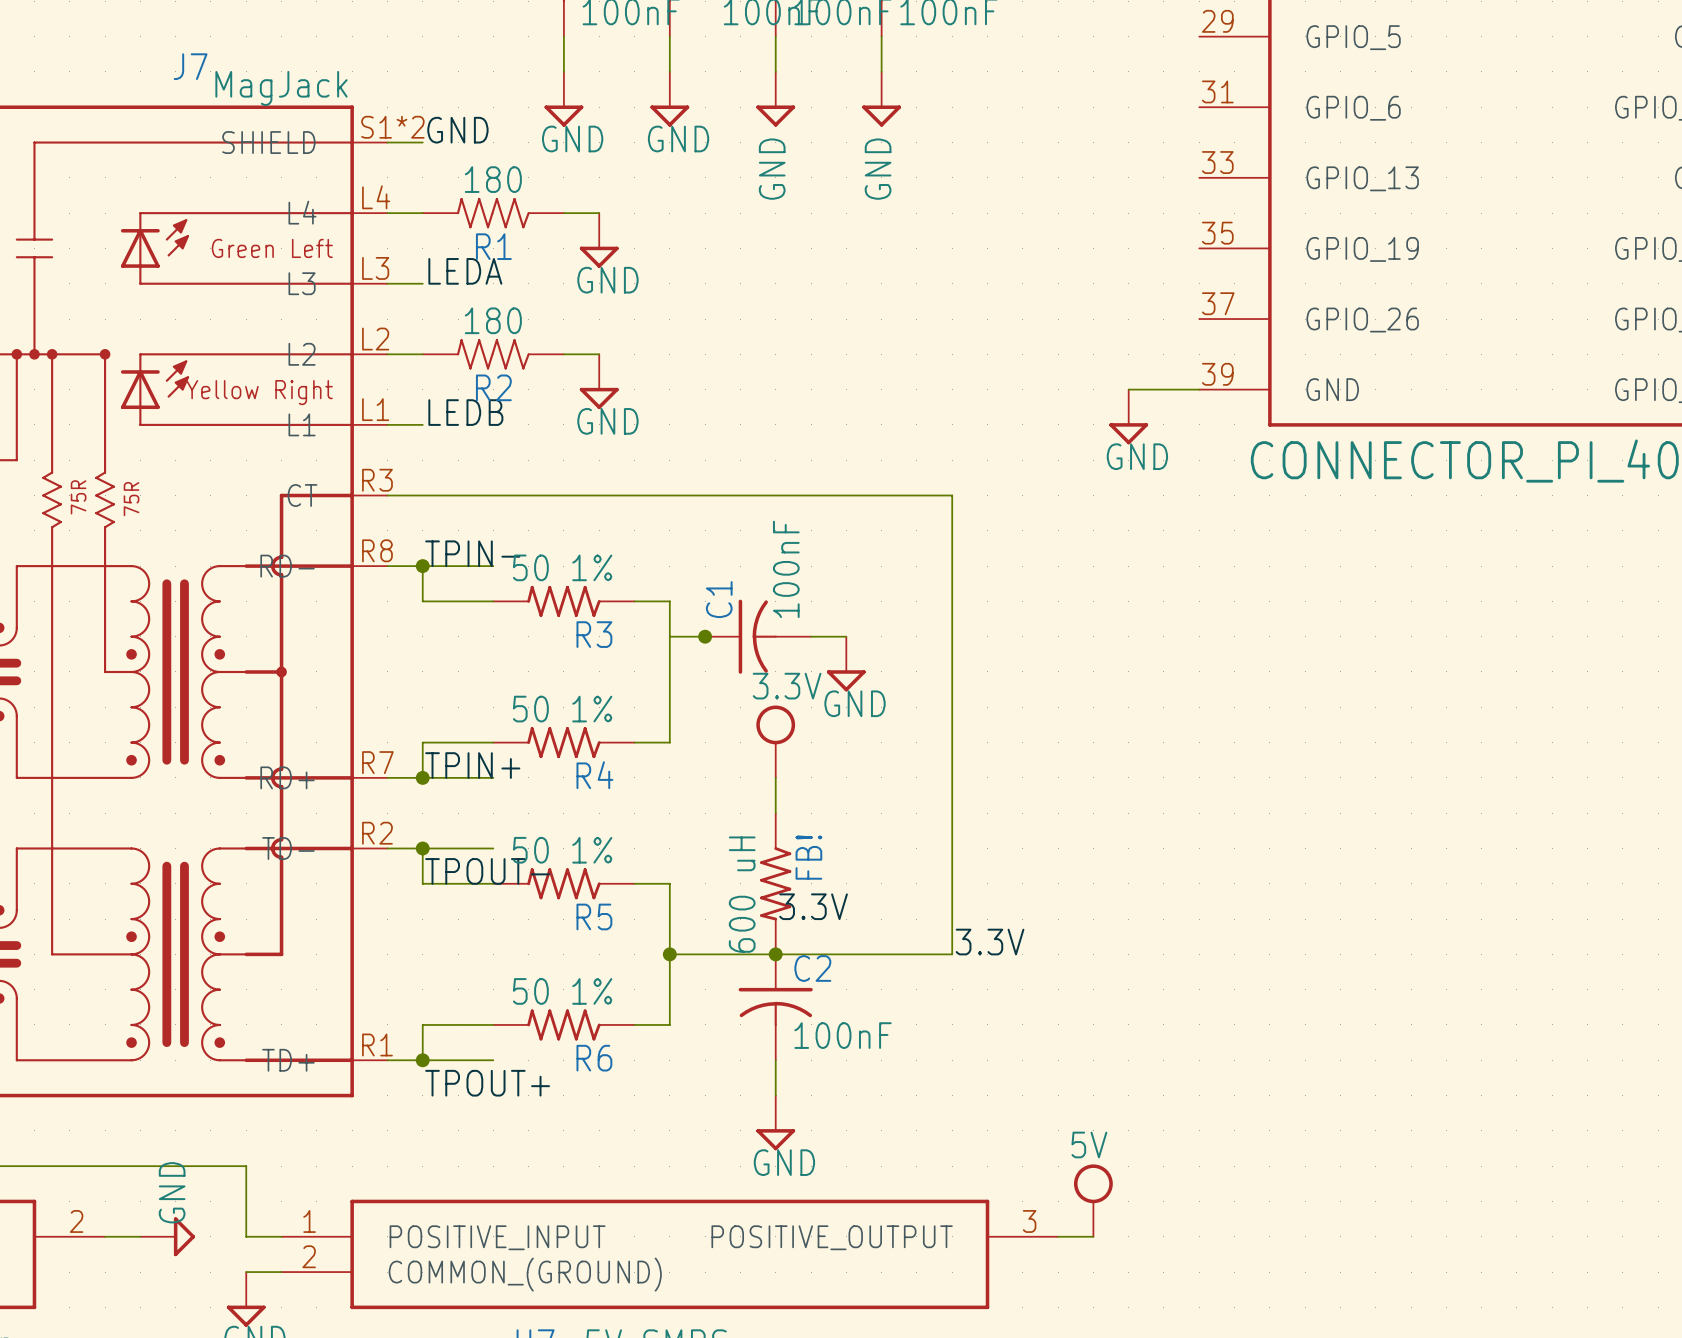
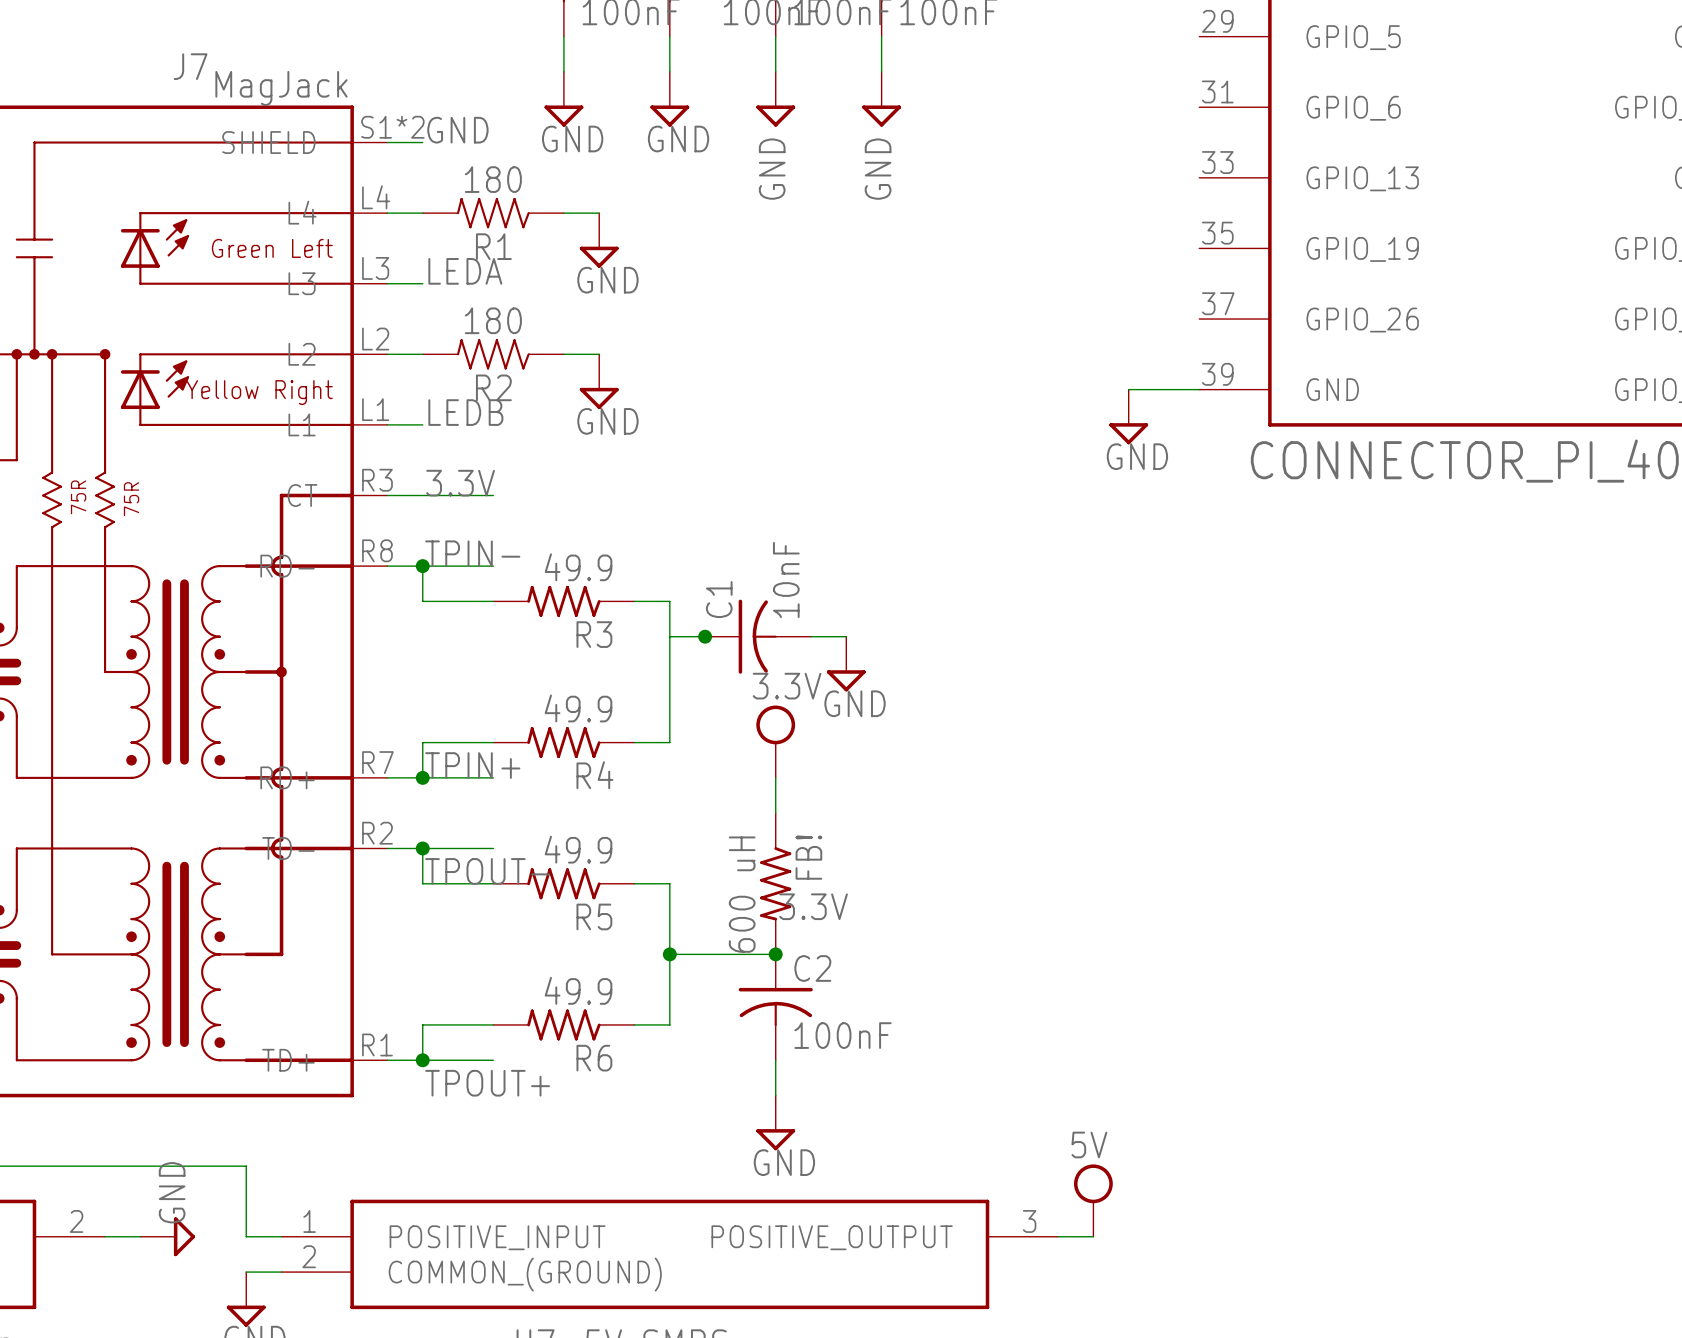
label: none -> 3.3V (460, 483)
wire: (493, 495) (952, 495) (952, 954) (775, 954) -> none
R3 value: 50 1% (562, 567) -> 49.9 (578, 567)
C1 value: 100nF (786, 569) -> 10nF (786, 579)
R4 value: 50 1% (562, 709) -> 49.9 (578, 708)
R5 value: 50 1% (562, 850) -> 49.9 (578, 849)
label: 3.3V (990, 942) -> none
R6 value: 50 1% (562, 991) -> 49.9 (578, 990)

